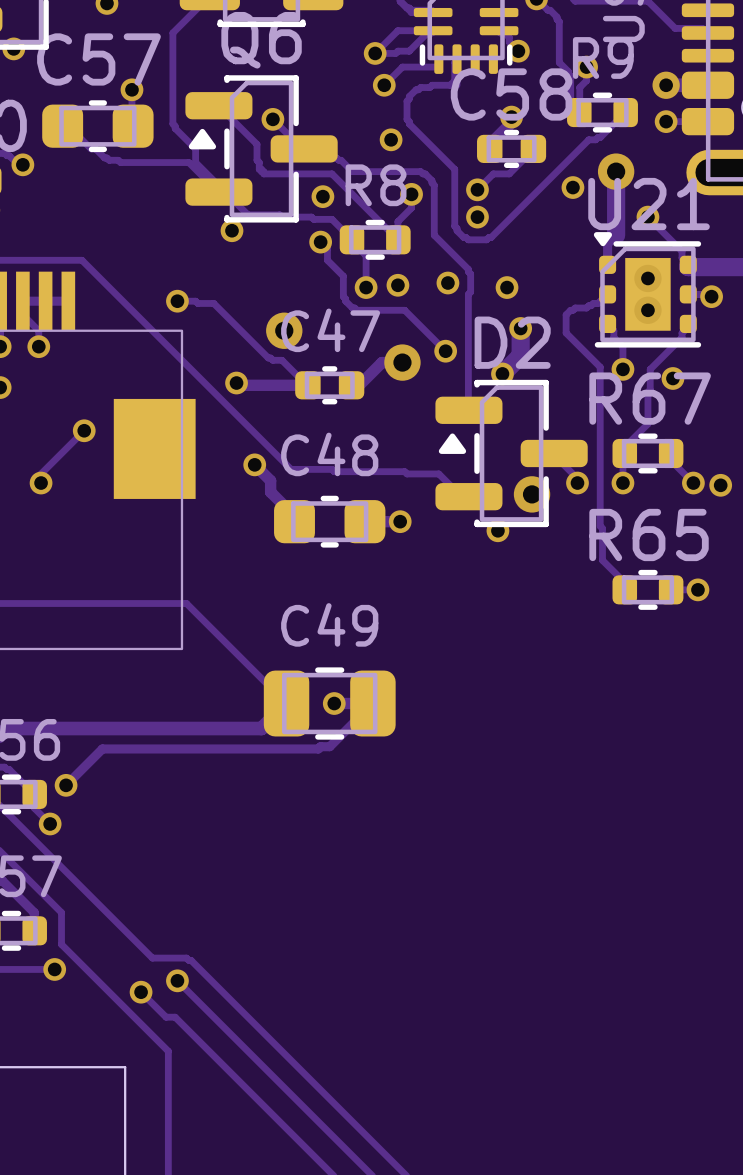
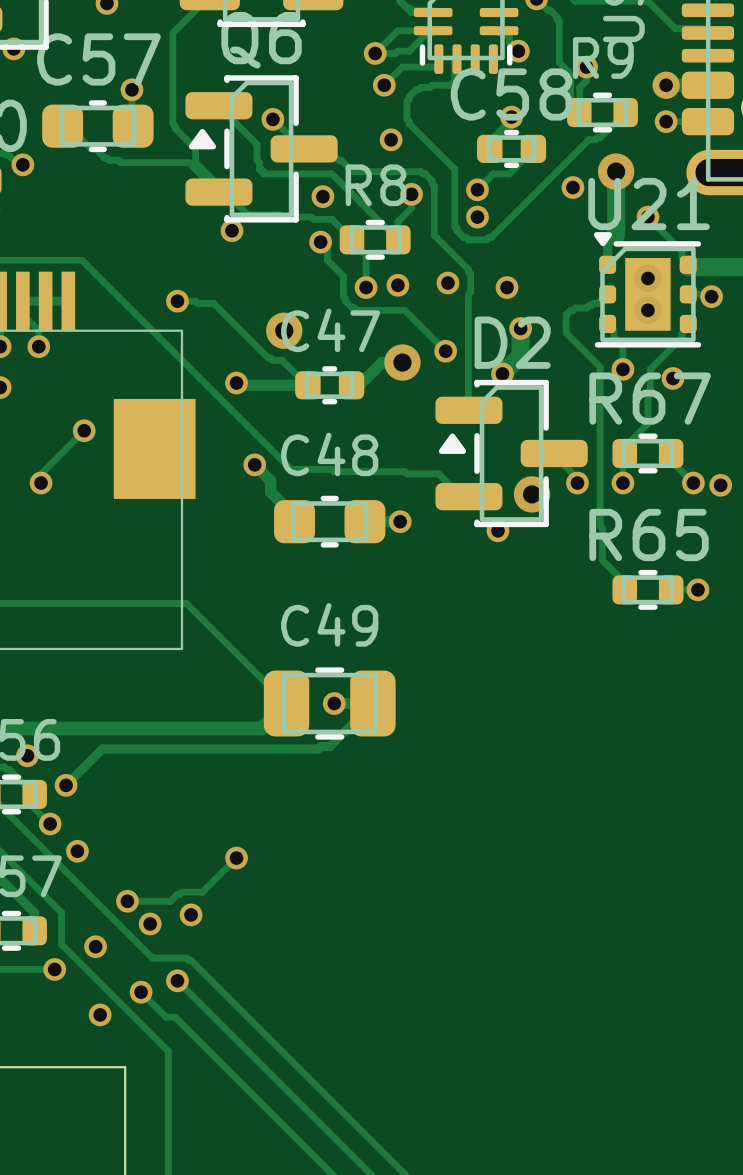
via: none -> (27, 755)
via: none -> (77, 851)
track: none -> (236, 858) (202, 892) (181, 892) (170, 901) (127, 901)
via: none -> (236, 858)
via: none -> (127, 901)
via: none -> (191, 914)
via: none -> (150, 924)
via: none -> (95, 946)
via: none -> (100, 1014)

